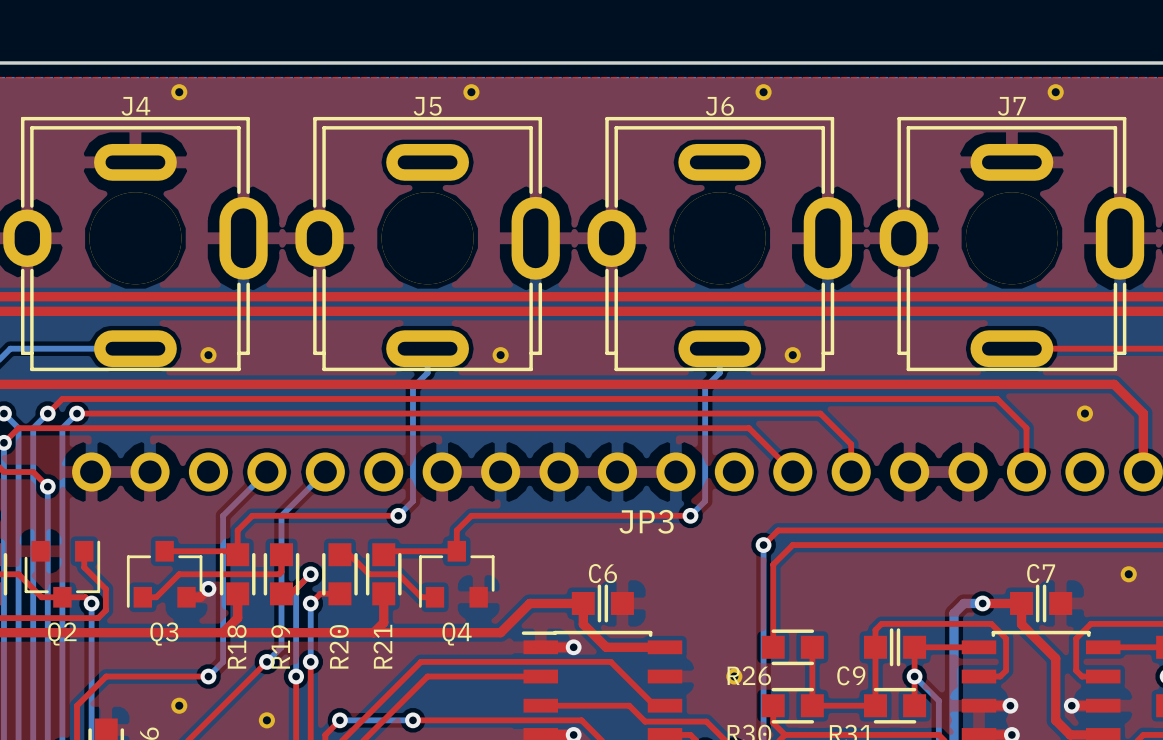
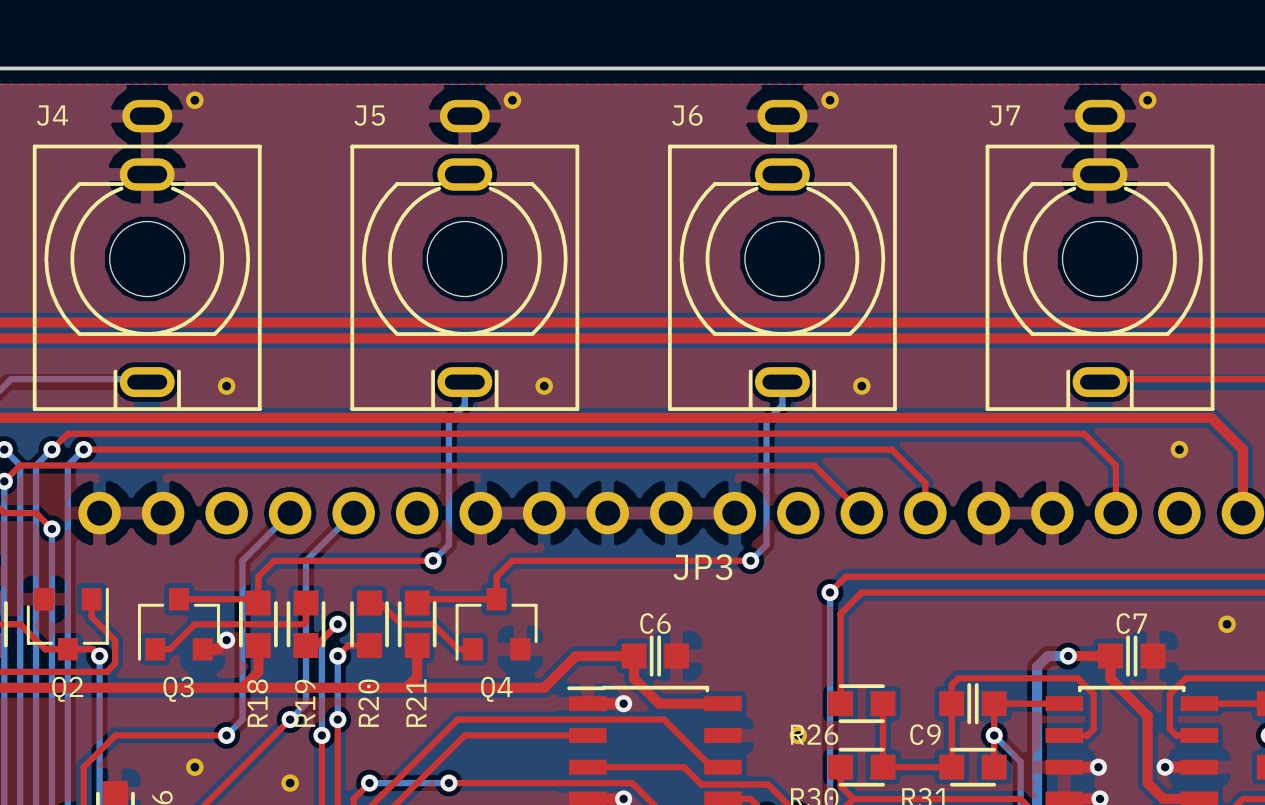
J4 name position: J4 (135, 106) -> J4 (52, 115)
J5 name position: J5 (427, 106) -> J5 (369, 115)
J6 name position: J6 (719, 106) -> J6 (687, 115)
J7 name position: J7 (1011, 106) -> J7 (1004, 115)
J4 footprint: [3, 116, 268, 372] -> [32, 99, 262, 411]
J5 footprint: [295, 116, 560, 372] -> [350, 99, 580, 411]
J6 footprint: [587, 116, 853, 372] -> [668, 99, 897, 411]
J7 footprint: [879, 116, 1145, 372] -> [985, 99, 1215, 411]

